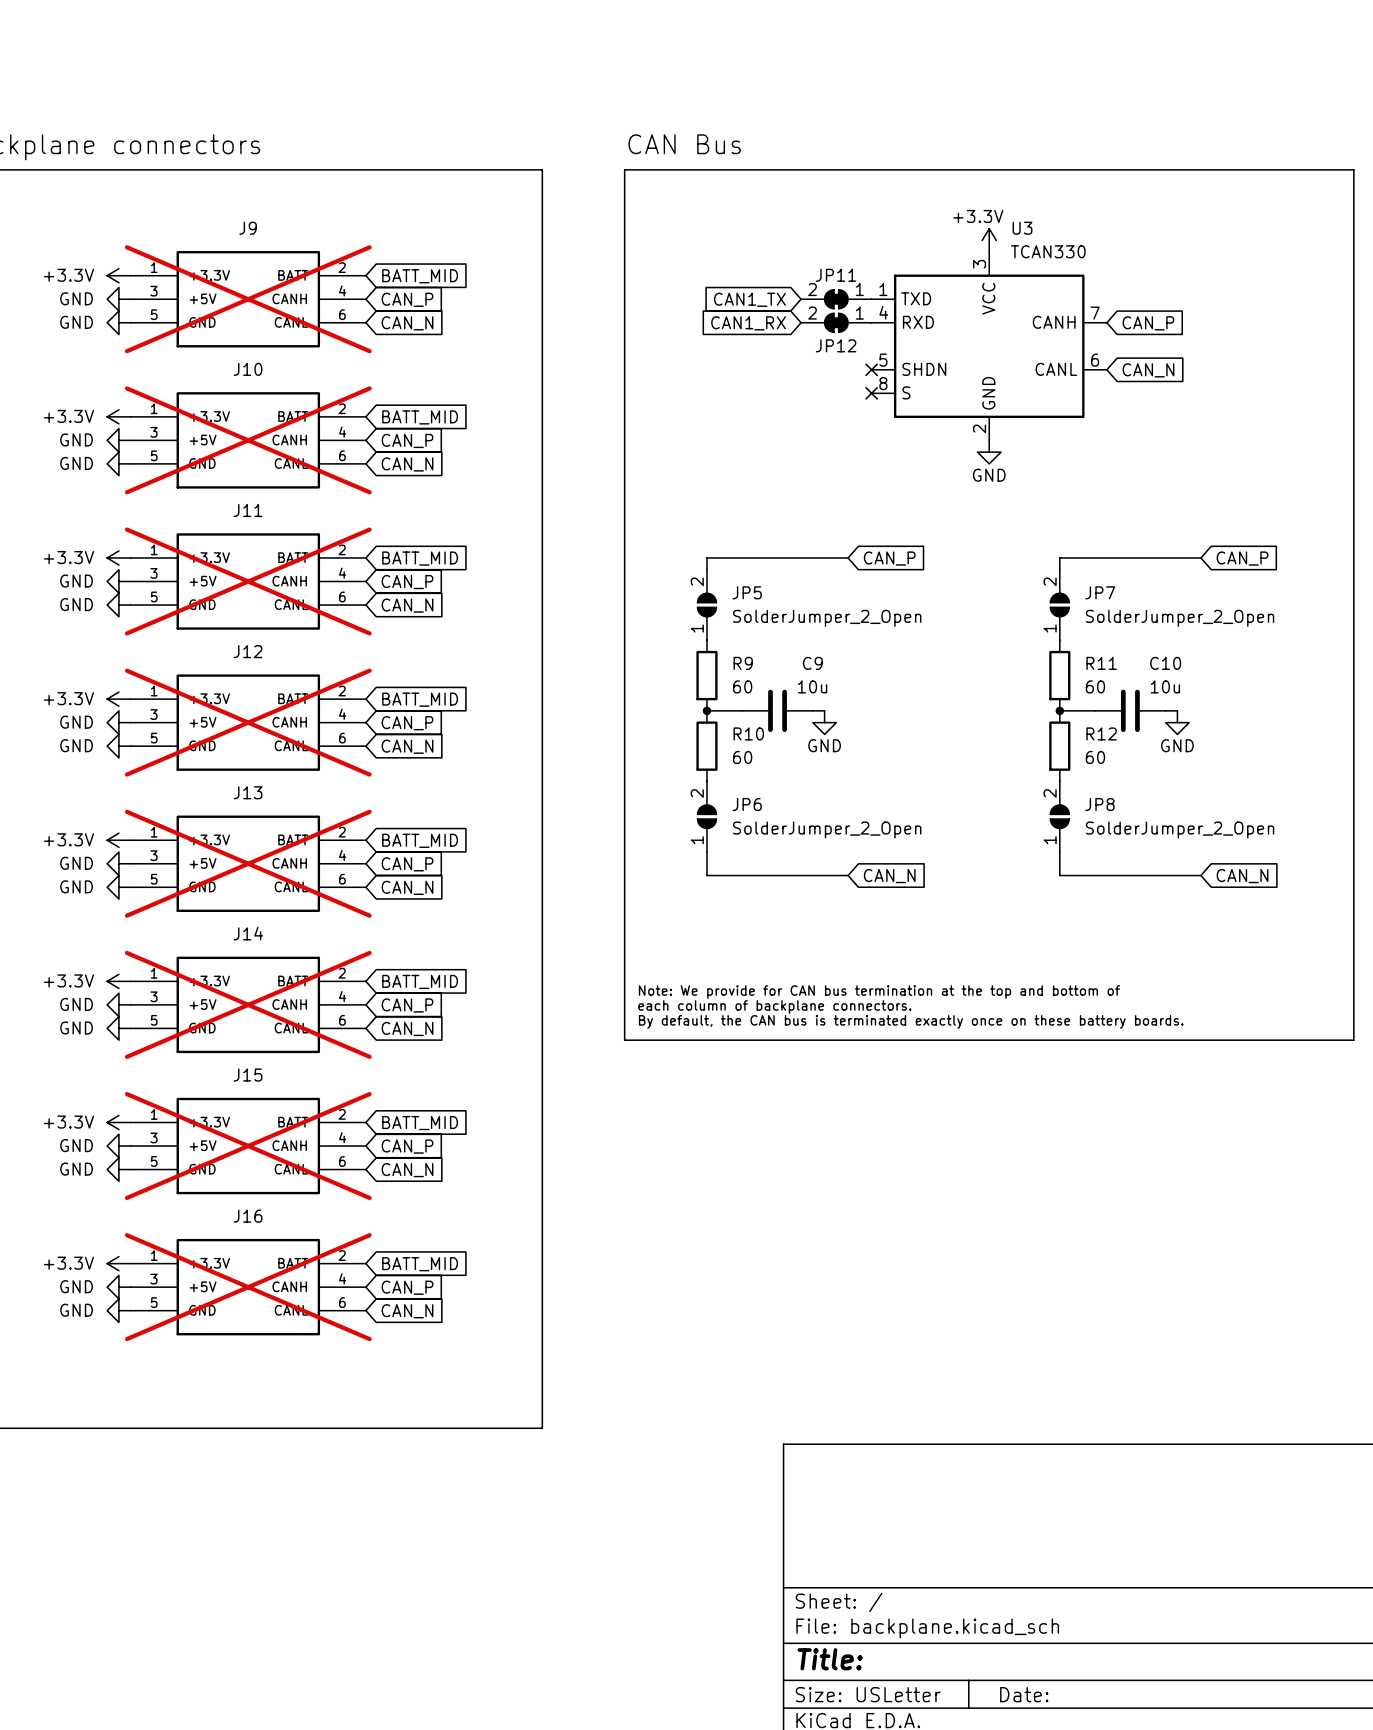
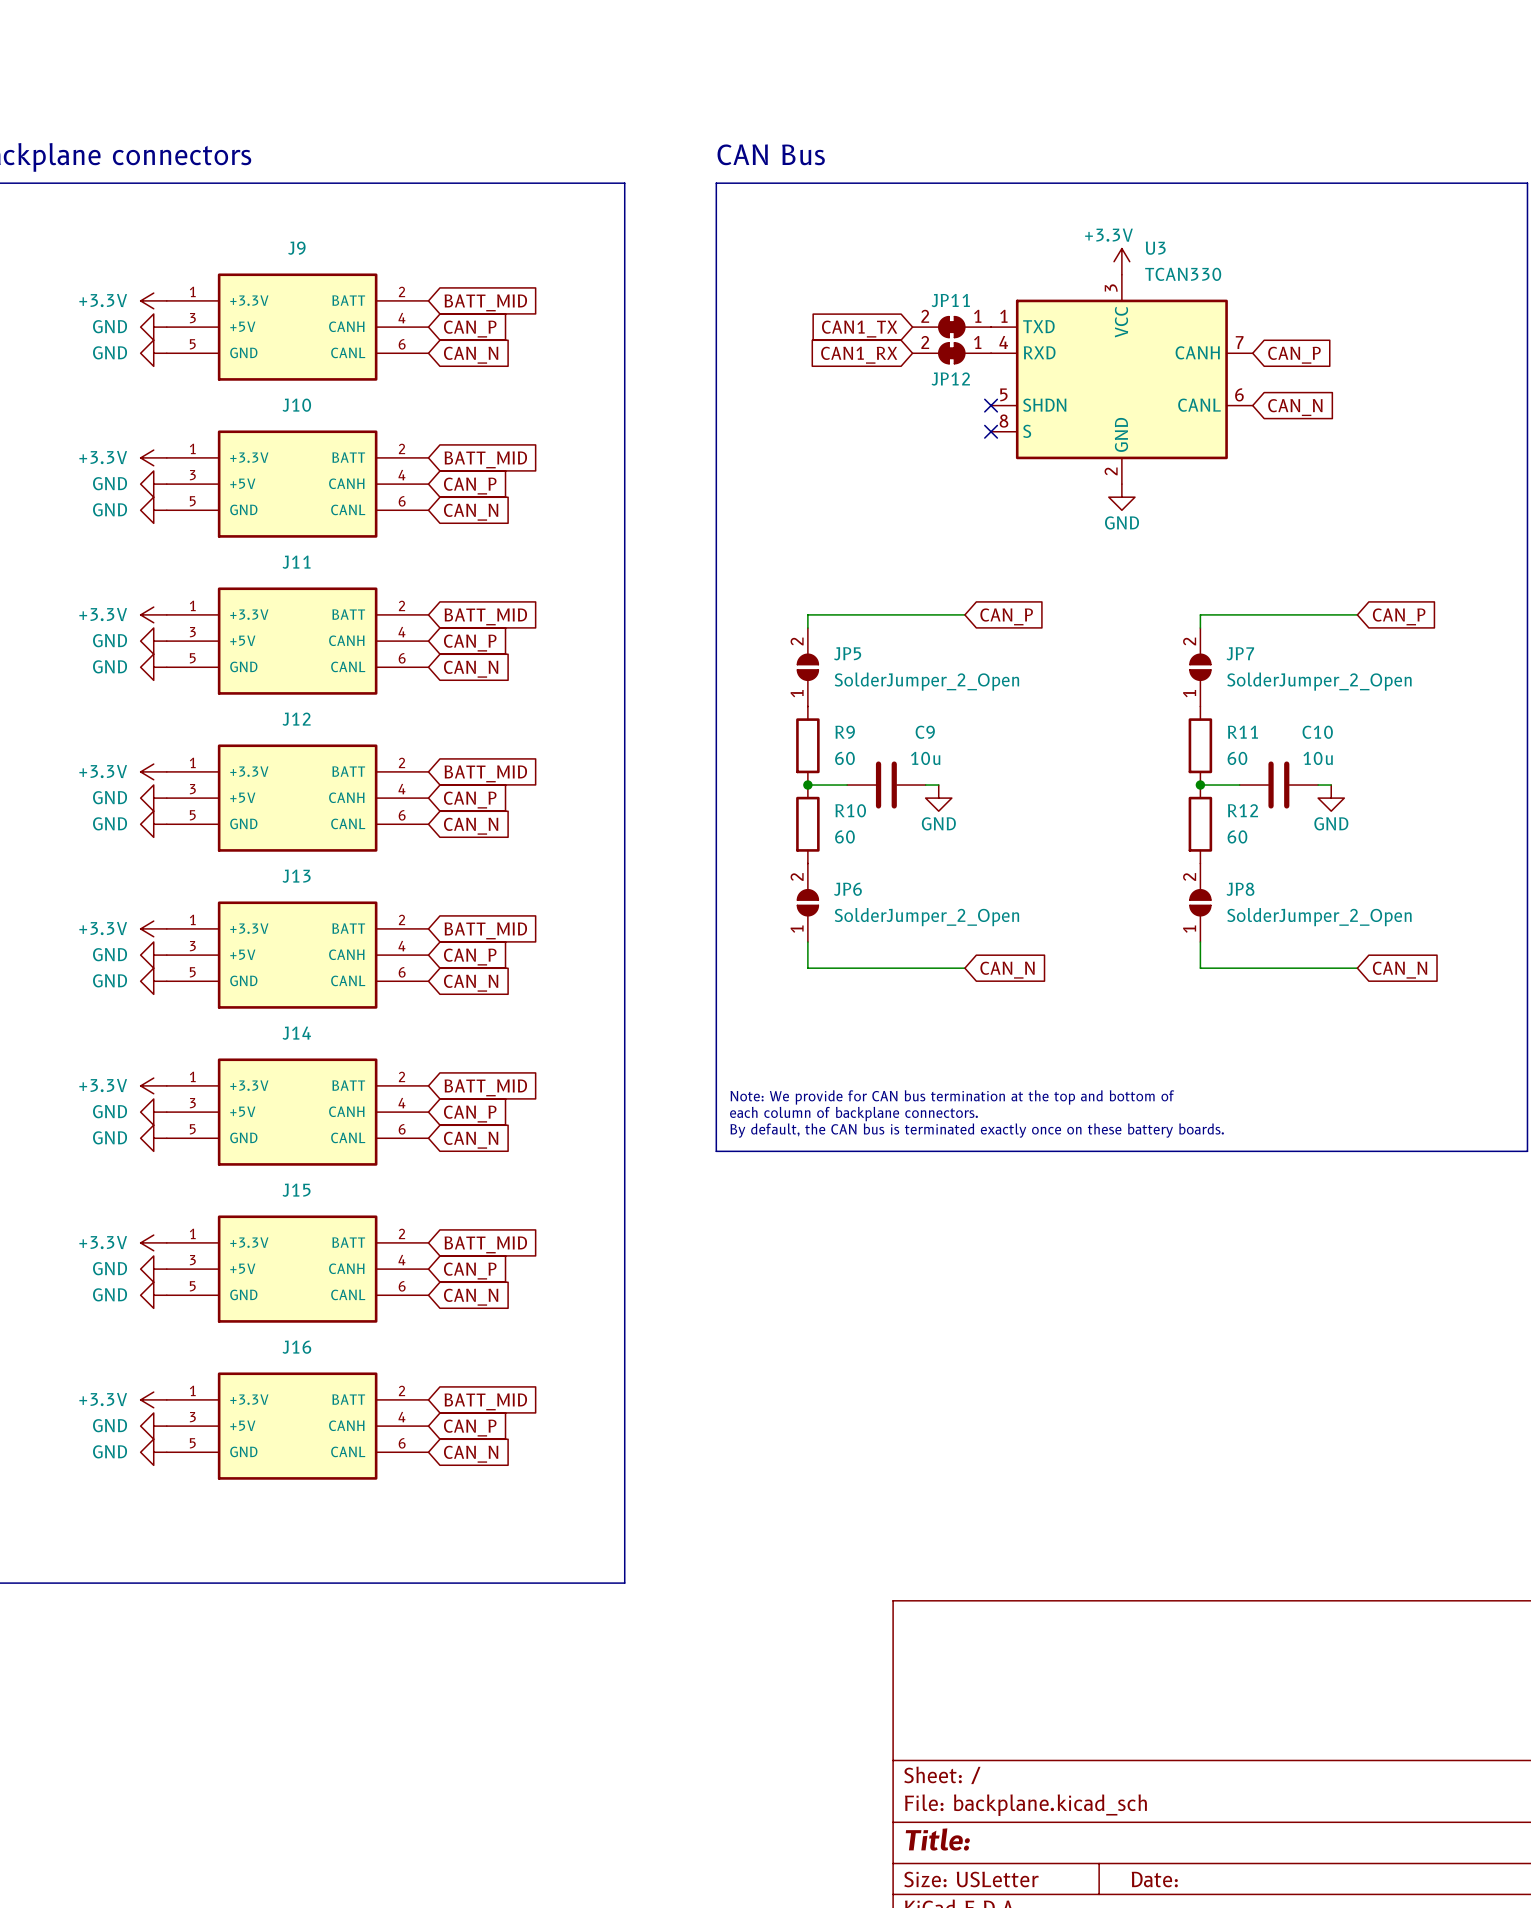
J9 do-not-place cross: (248, 299) -> none
J10 do-not-place cross: (248, 440) -> none
J11 do-not-place cross: (248, 581) -> none
J12 do-not-place cross: (248, 722) -> none
J13 do-not-place cross: (248, 863) -> none
J14 do-not-place cross: (248, 1004) -> none
J15 do-not-place cross: (248, 1146) -> none
J16 do-not-place cross: (248, 1287) -> none

